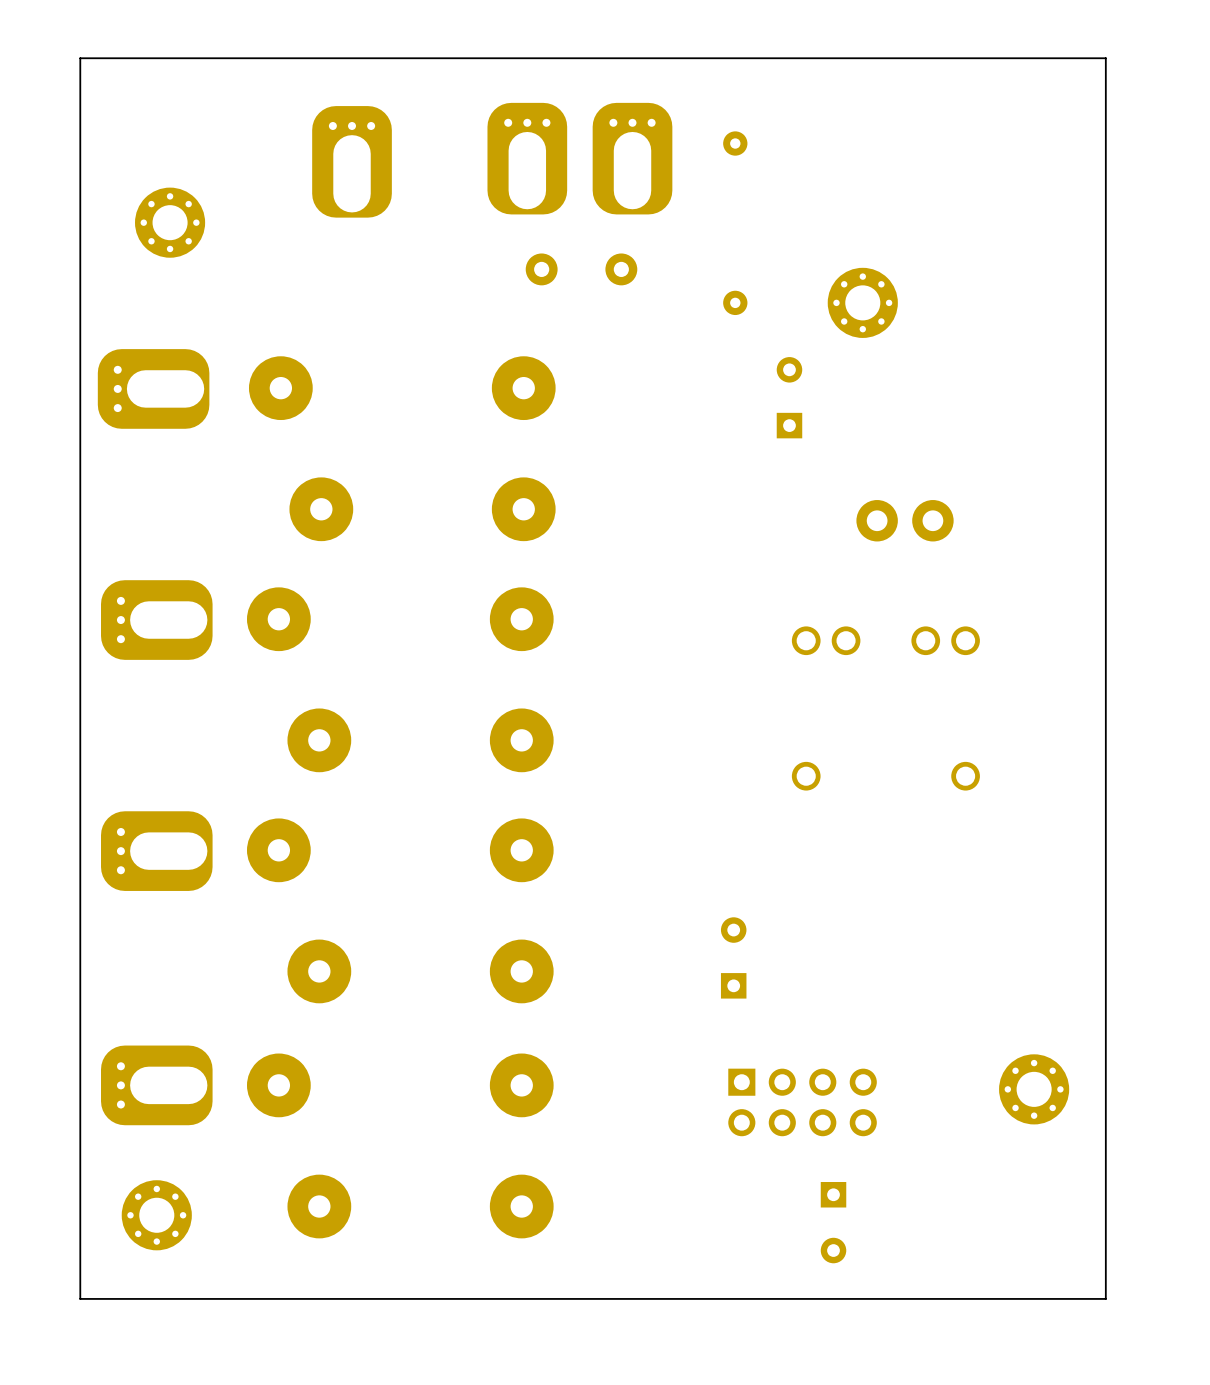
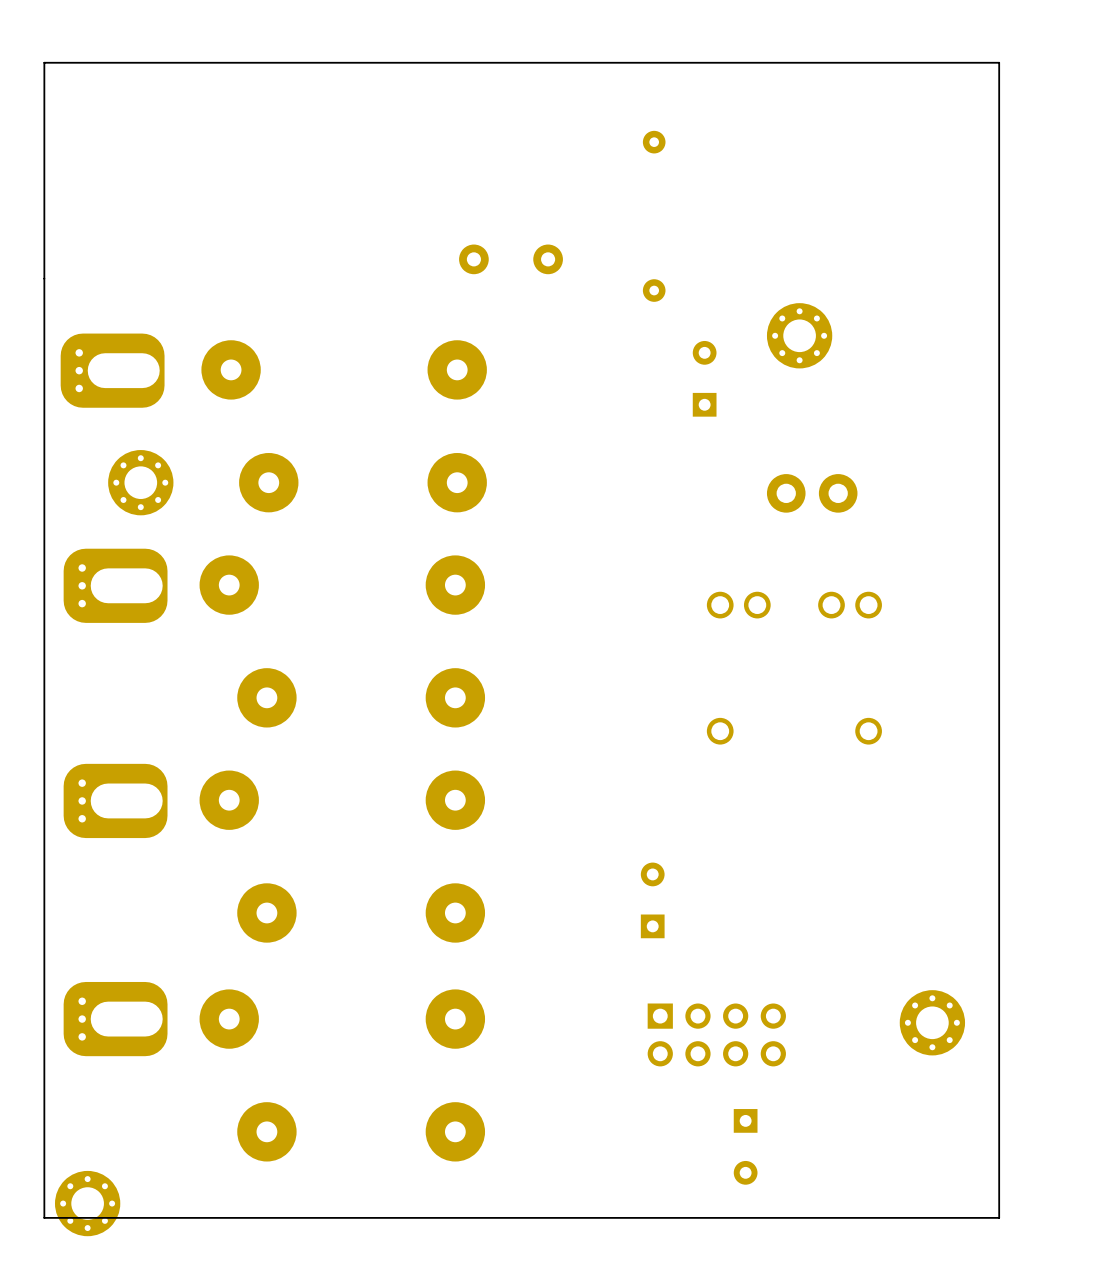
part: (527, 158) -> none
part: (632, 158) -> none
part: (352, 161) -> none
part position: (170, 222) -> (140, 482)
part position: (862, 302) -> (799, 335)
part position: (156, 1215) -> (87, 1203)

